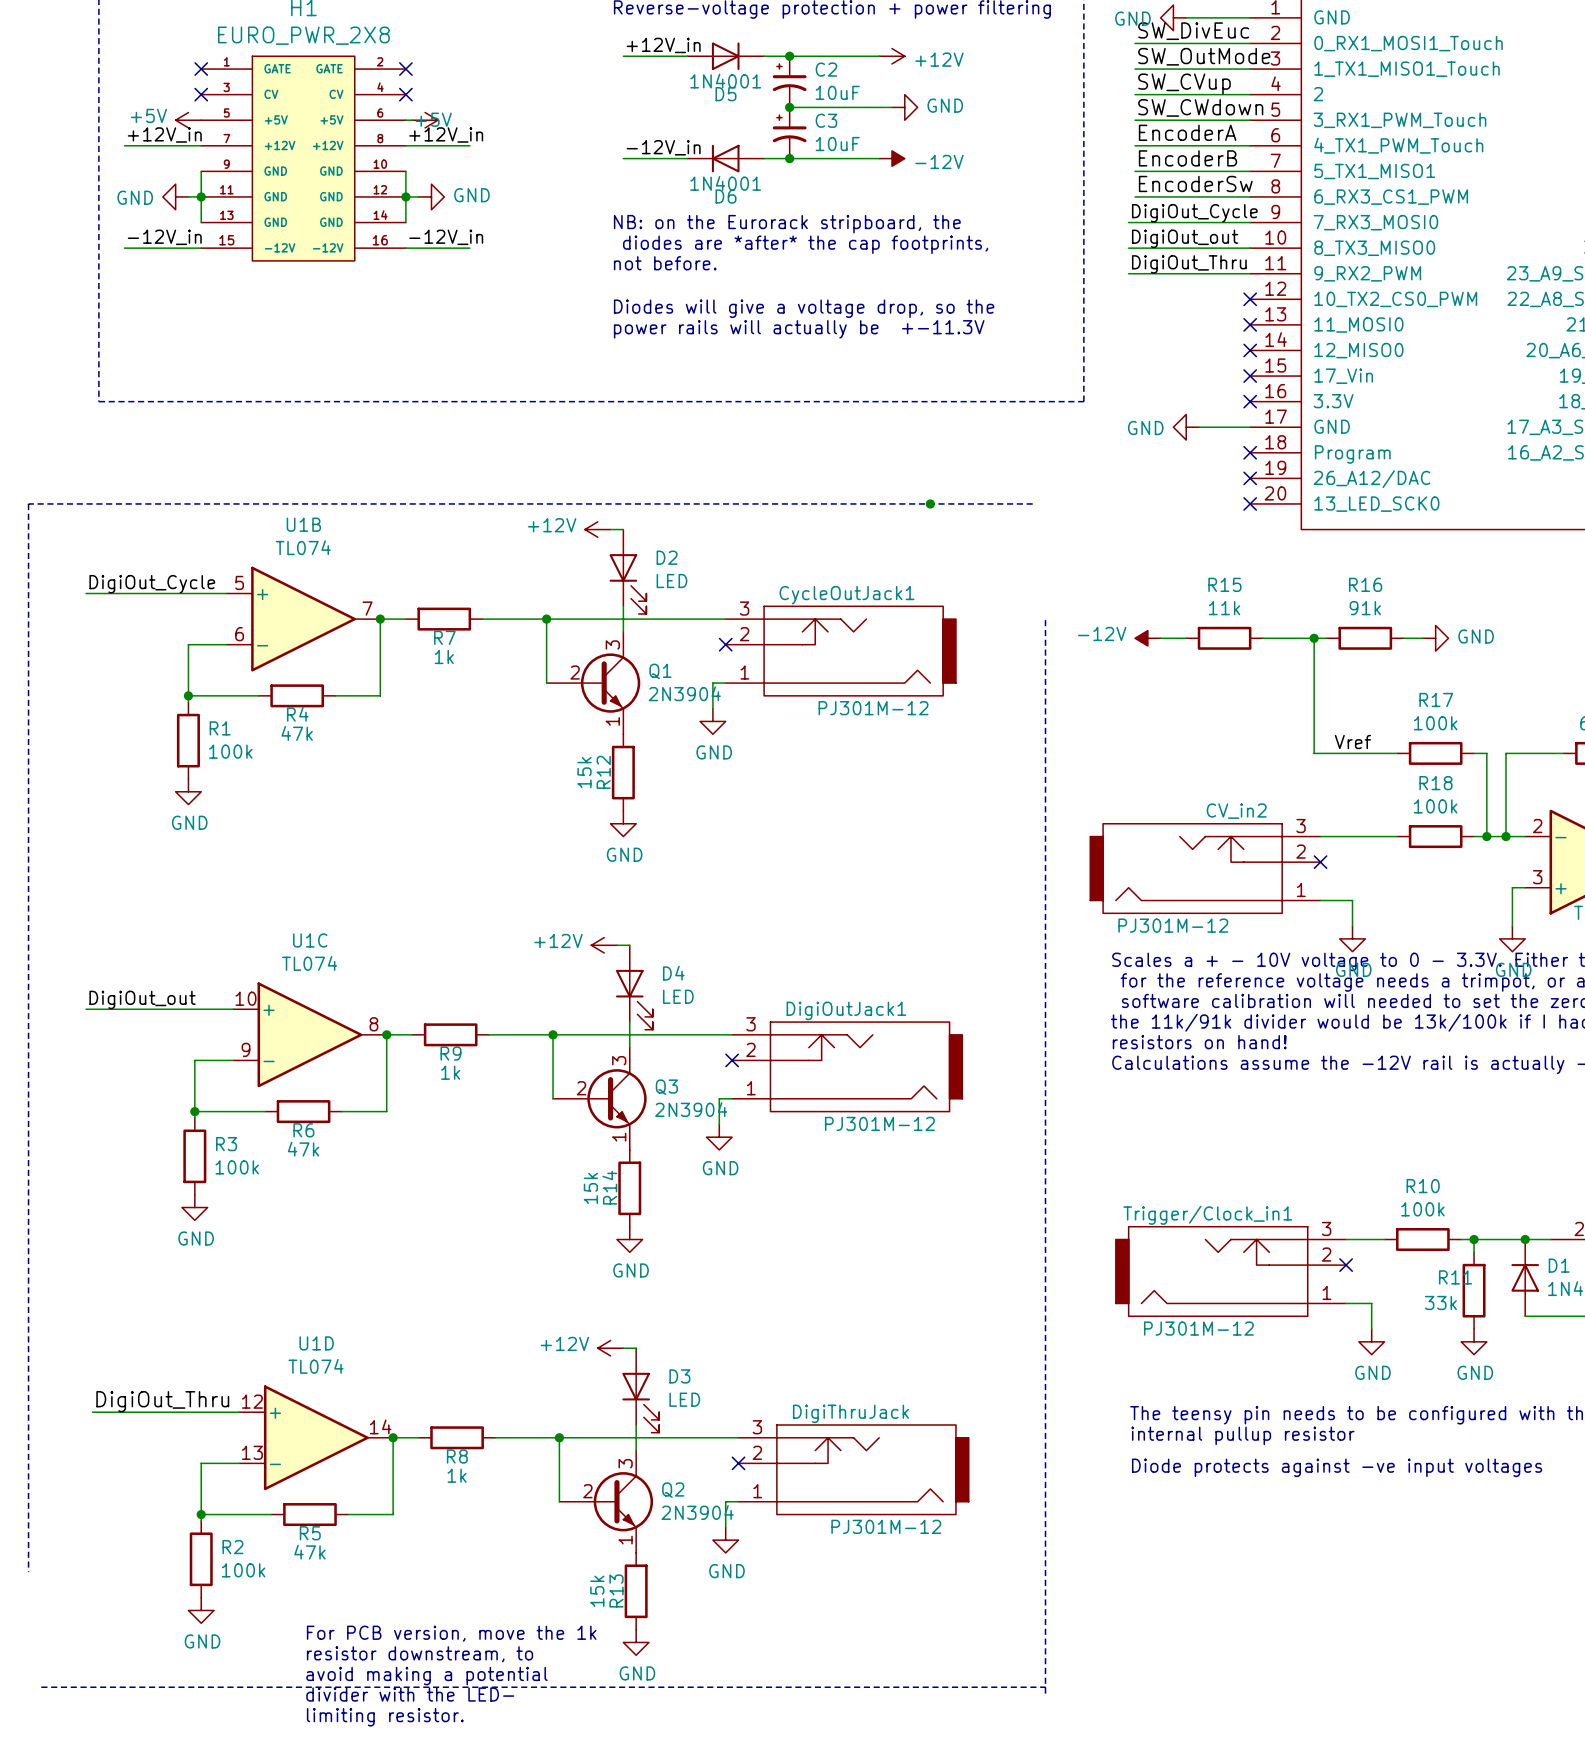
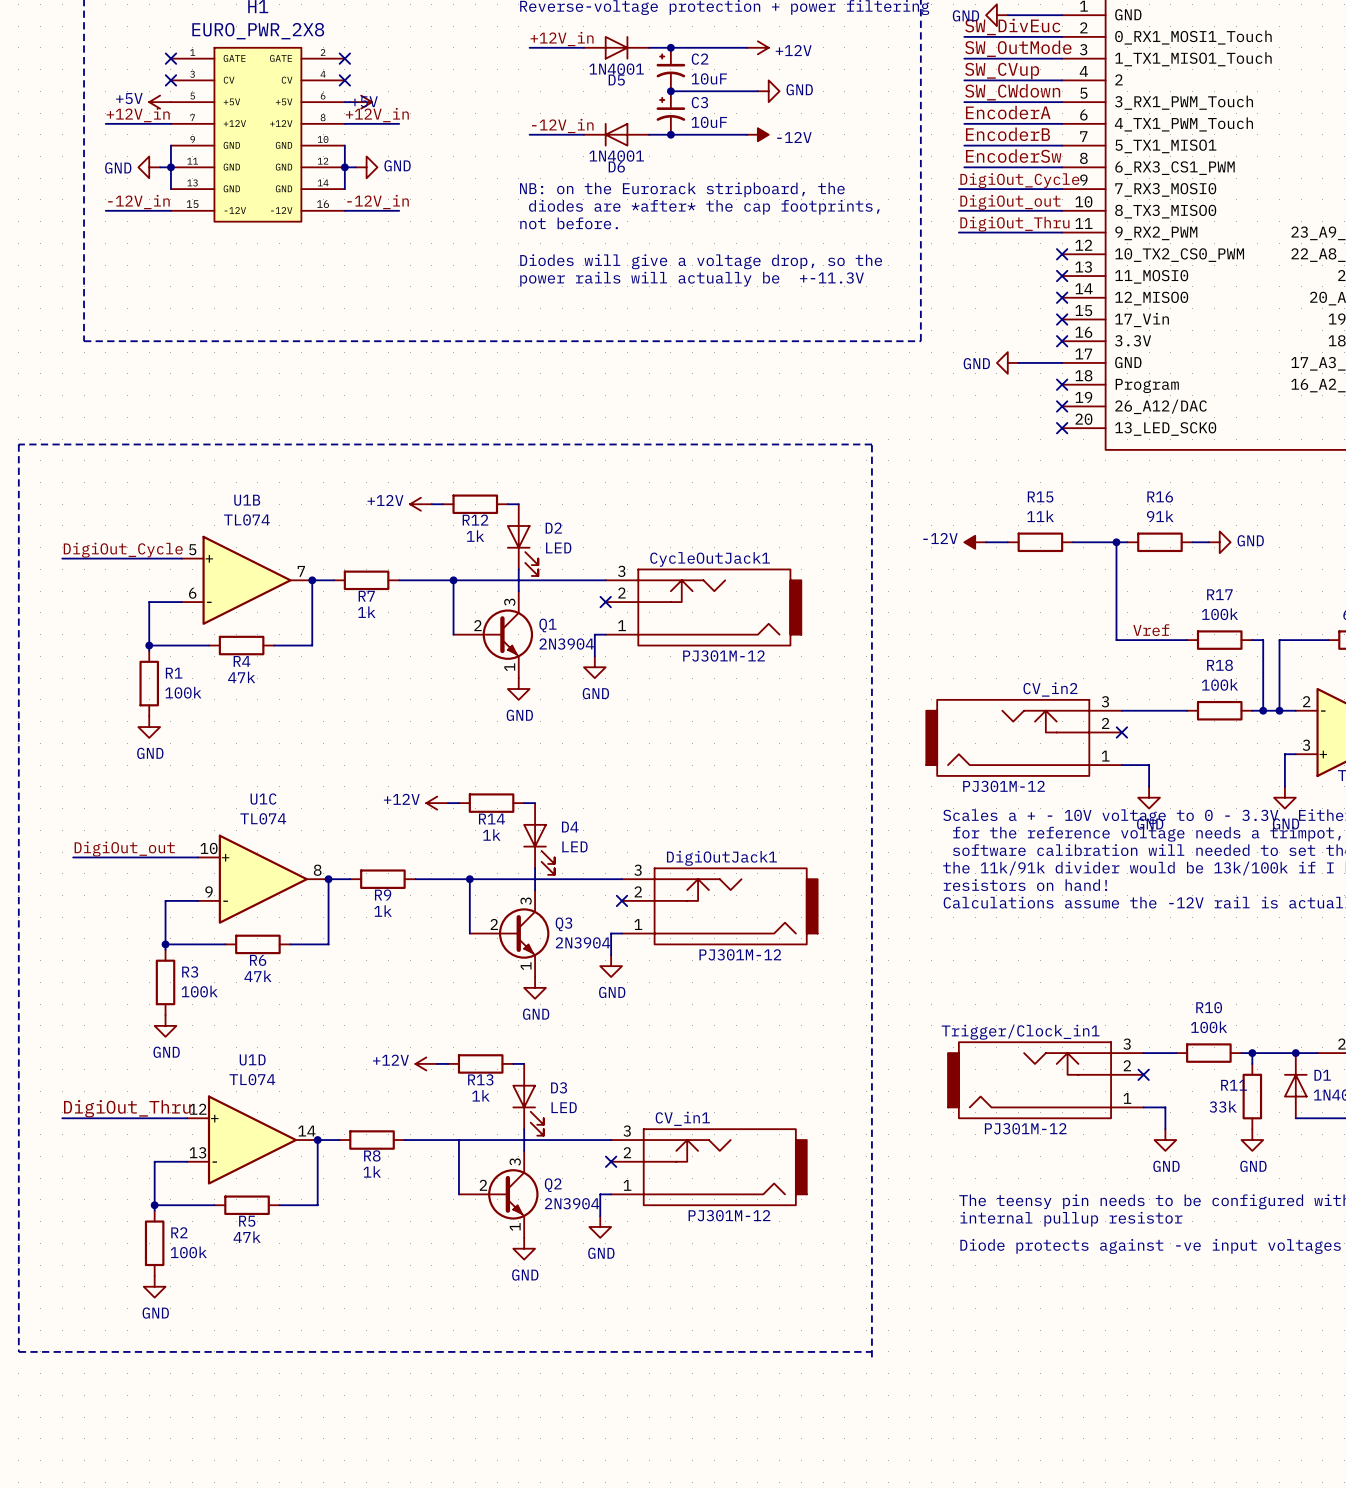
junction: (930, 503) -> none
line: (1032, 503) (28, 503) (28, 1572) -> none
power symbol position: +12V (597, 529) -> +12V (420, 504)
wire: (610, 529) (623, 529) -> (507, 504) (518, 504)
D2 position: (627, 571) -> (522, 540)
label position: DigiOut_Cycle (152, 584) -> DigiOut_Cycle (123, 550)
wire: (86, 593) (226, 593) -> (62, 558) (181, 558)
wire: none -> (431, 504) (442, 504)
wire: (623, 606) (623, 631) -> (518, 569) (518, 591)
U1B position: (303, 619) -> (247, 580)
junction: (380, 619) -> none
wire: (405, 619) (380, 619) (380, 695) (335, 695) -> (333, 580) (312, 580) (312, 645) (274, 645)
R7 position: (444, 619) -> (366, 580)
wire: (482, 619) (725, 619) -> (399, 580) (605, 580)
wire: (546, 619) (546, 683) -> (453, 580) (453, 634)
junction: (546, 619) -> none
line: (1045, 619) (1045, 1693) -> none
wire: (226, 644) (188, 644) (188, 702) -> (181, 602) (149, 602) (149, 650)
no-connect mark: (725, 644) -> none
CycleOutJack1 position: (840, 651) -> (703, 607)
junction: none -> (312, 580)
junction: none -> (453, 580)
Q1 position: (593, 683) -> (493, 634)
wire: (725, 683) (712, 683) (712, 708) -> (605, 634) (594, 634) (594, 656)
wire: (188, 695) (258, 695) -> (149, 645) (209, 645)
junction: (188, 695) -> none
R4 position: (297, 695) -> (241, 645)
no-connect mark: none -> (605, 602)
power symbol: GND (712, 721) -> none
R1 position: (188, 740) -> (149, 683)
junction: none -> (149, 645)
R12 value: 15k (584, 772) -> 1k (475, 536)
R12 name position: R12 (603, 772) -> R12 (475, 520)
R12 rotation: 0° (623, 772) -> 90° clockwise (475, 504)
R12 position: (623, 772) -> (475, 504)
power symbol: none -> GND (594, 667)
power symbol position: GND (188, 791) -> GND (149, 727)
power symbol position: GND (623, 823) -> GND (518, 689)
wire: none -> (448, 803) (458, 803)
power symbol position: +12V (604, 945) -> +12V (437, 803)
R14 name position: R14 (609, 1187) -> R14 (491, 819)
R14 value: 15k (590, 1188) -> 1k (491, 834)
R14 rotation: 0° (629, 1188) -> 90° clockwise (491, 803)
R14 position: (629, 1188) -> (491, 803)
power symbol position: GND (629, 1239) -> GND (535, 987)
wire: none -> (437, 1063) (448, 1063)
junction: none -> (317, 1140)
power symbol position: +12V (610, 1348) -> +12V (426, 1063)
wire: (623, 1348) (636, 1348) -> (513, 1063) (524, 1063)
no-connect mark: none -> (611, 1161)
CV_in1: none -> PJ301M-12 (708, 1167)
D3 position: (640, 1390) -> (528, 1099)
label position: DigiOut_Thru (162, 1401) -> DigiOut_Thru (127, 1108)
wire: (92, 1412) (239, 1412) -> (62, 1118) (187, 1118)
junction: none -> (154, 1205)
wire: (636, 1424) (636, 1450) -> (524, 1129) (524, 1150)
U1D position: (316, 1437) -> (252, 1140)
junction: (393, 1437) -> none
wire: (418, 1437) (393, 1437) (393, 1514) (348, 1514) -> (339, 1140) (317, 1140) (317, 1205) (279, 1205)
R8 position: (457, 1437) -> (372, 1140)
wire: (495, 1437) (738, 1437) -> (404, 1140) (611, 1140)
wire: (559, 1437) (559, 1501) -> (458, 1140) (458, 1194)
junction: (559, 1437) -> none
power symbol: none -> GND (600, 1226)
wire: (239, 1463) (201, 1463) (201, 1520) -> (187, 1161) (154, 1161) (154, 1210)
no-connect mark: (738, 1463) -> none
power symbol: none -> GND (524, 1248)
DigiThruJack: PJ301M-12 (853, 1469) -> none
Q2 position: (606, 1501) -> (498, 1194)
wire: (738, 1501) (725, 1501) (725, 1527) -> (611, 1194) (600, 1194) (600, 1216)
wire: (201, 1514) (271, 1514) -> (154, 1205) (214, 1205)
junction: (201, 1514) -> none
R5 position: (309, 1514) -> (247, 1205)
power symbol: GND (725, 1540) -> none
R2 position: (201, 1559) -> (154, 1243)
R13 name position: R13 (616, 1590) -> R13 (480, 1079)
R13 value: 15k (597, 1591) -> 1k (480, 1095)
R13 rotation: 0° (636, 1591) -> 90° clockwise (480, 1063)
R13 position: (636, 1591) -> (480, 1063)
line: none -> (871, 1351) (18, 1351) (18, 444) (871, 444) (871, 1357)
power symbol position: GND (201, 1610) -> GND (154, 1286)
text: For PCB version, move the 1k (451, 1633) -> none
power symbol: GND (636, 1642) -> none
text: resistor downstream, to (420, 1654) -> none
text: avoid making a potential (427, 1676) -> none
line: (41, 1687) (1045, 1687) -> none
text: divider with the LED- (410, 1694) -> none
text: limiting resistor. (385, 1717) -> none

